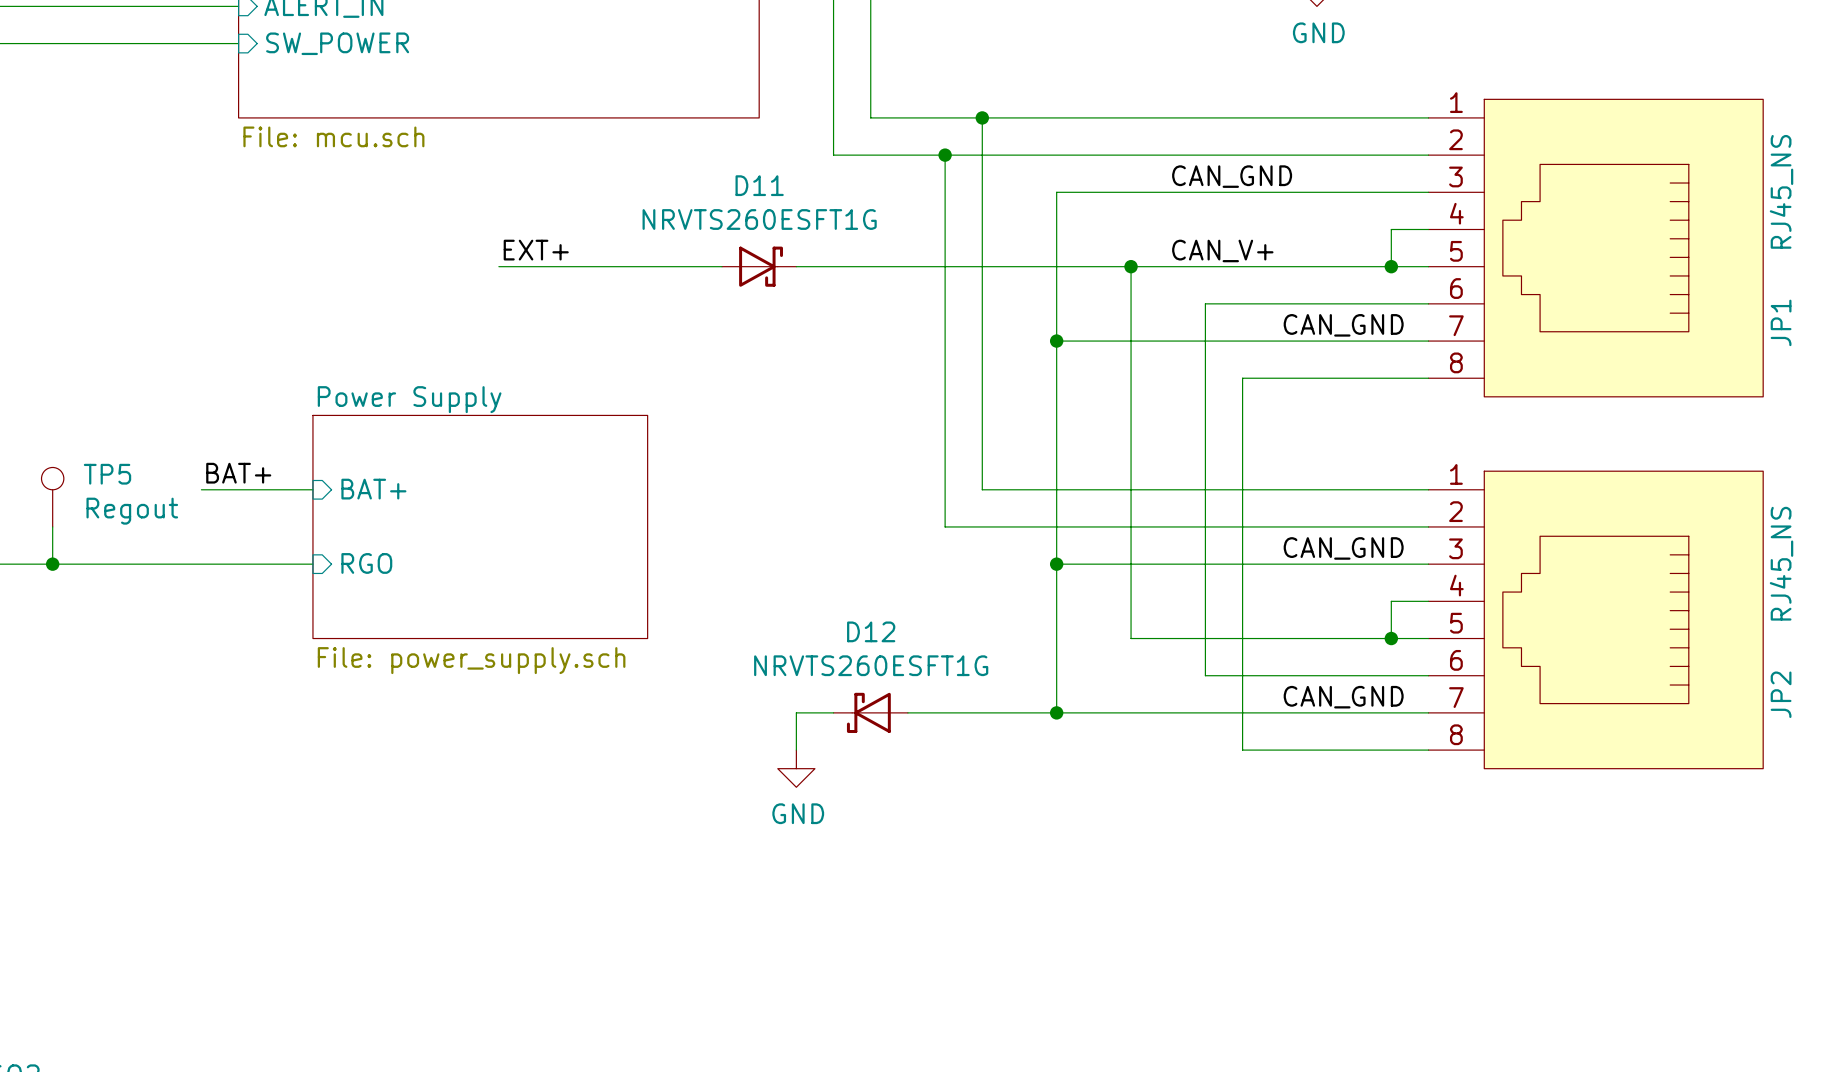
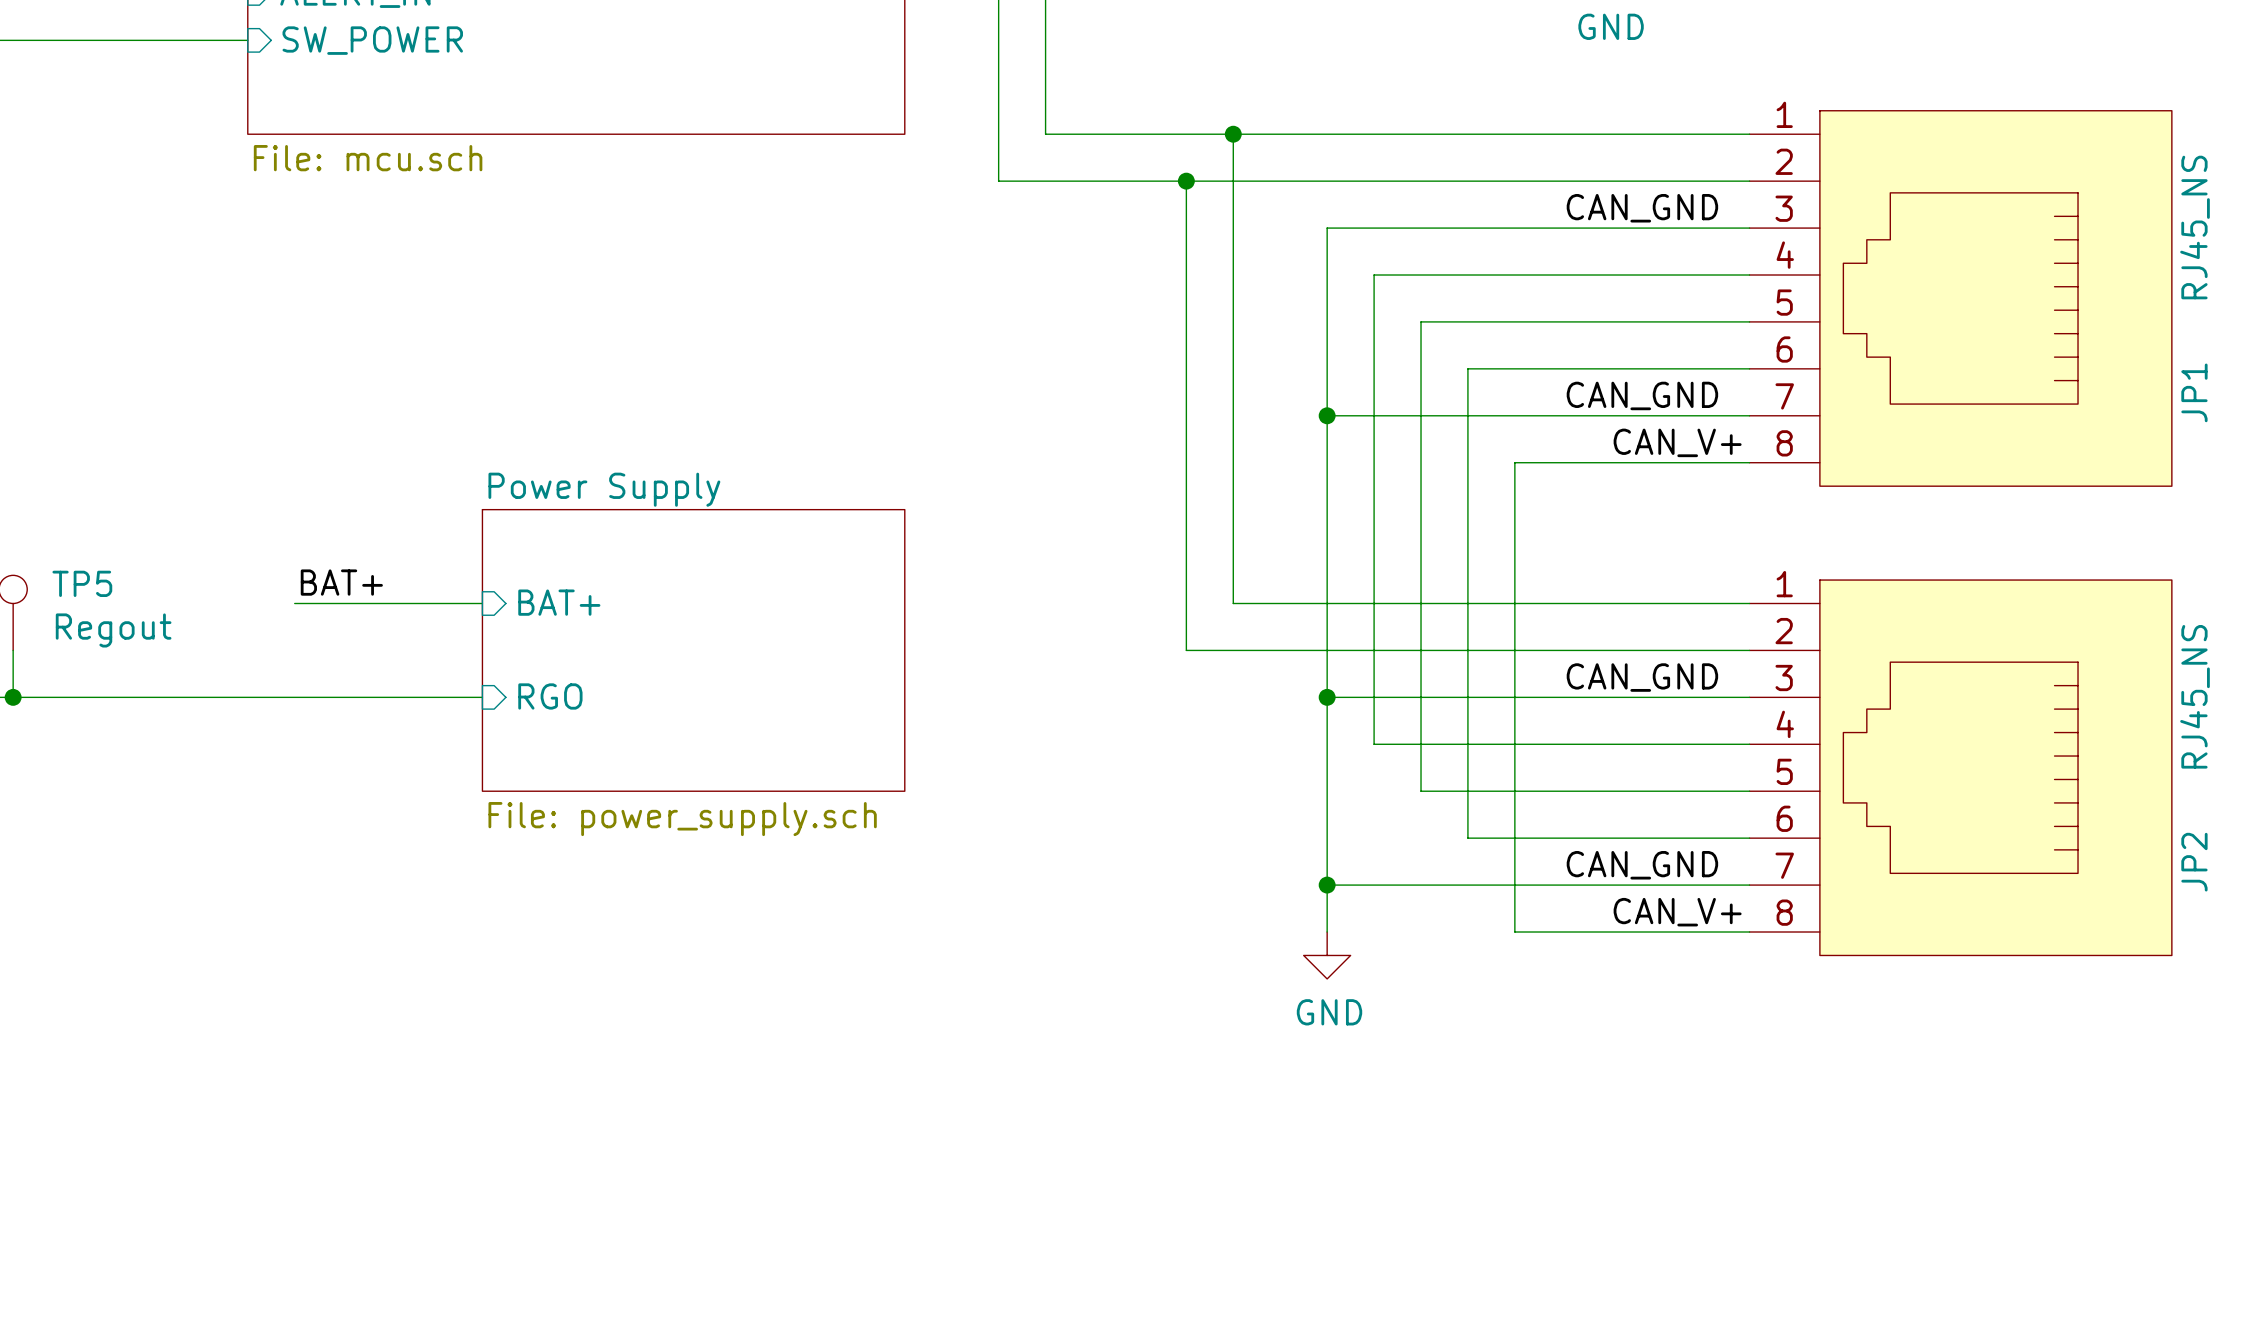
wire: (982, 117) (982, 155) -> none
junction: (982, 117) -> none
wire: none -> (1233, 134) (1233, 603)
junction: none -> (1233, 134)
wire: (945, 155) (945, 526) (982, 526) -> none
junction: (945, 155) -> none
junction: none -> (1186, 181)
label position: CAN_GND (1232, 176) -> CAN_GND (1642, 208)
wire: (1093, 192) (1056, 192) (1056, 712) -> (1327, 228) (1327, 932)
wire: (1391, 229) (1391, 266) -> (1702, 275) (1374, 275) (1374, 321)
label: EXT+ (536, 250) -> none
label position: CAN_V+ (1222, 250) -> CAN_V+ (1677, 442)
wire: (498, 266) (722, 266) -> none
D11: NRVTS260ESFT1G (759, 266) -> none
wire: (796, 266) (1168, 266) -> (1421, 791) (1421, 321)
junction: (1131, 266) -> none
junction: (1391, 266) -> none
wire: (1056, 341) (1093, 341) -> none
junction position: (1056, 341) -> (1327, 415)
label position: BAT+ (238, 473) -> BAT+ (341, 582)
wire: (201, 489) (275, 489) -> none
wire: none -> (341, 603) (482, 603)
sheet pin position: BAT+ (373, 489) -> BAT+ (559, 602)
wire: (982, 489) (1019, 489) -> (1186, 603) (1186, 650)
sheet Power Supply position: (480, 526) -> (693, 650)
sheet pin position: RGO (366, 563) -> RGO (550, 696)
wire: none -> (341, 697) (482, 697)
wire: (1056, 564) (1093, 564) -> none
junction position: (1056, 564) -> (1327, 697)
wire: (1131, 601) (1131, 638) (1168, 638) -> (1374, 744) (1702, 744)
wire: (1391, 601) (1391, 638) -> none
junction: (1391, 638) -> none
wire: (833, 712) (796, 712) (796, 750) -> none
D12: NRVTS260ESFT1G (870, 712) -> none
wire: (907, 712) (1093, 712) -> none
junction position: (1056, 712) -> (1327, 885)
label: none -> CAN_V+ (1677, 912)
power symbol position: GND (796, 768) -> GND (1327, 955)

